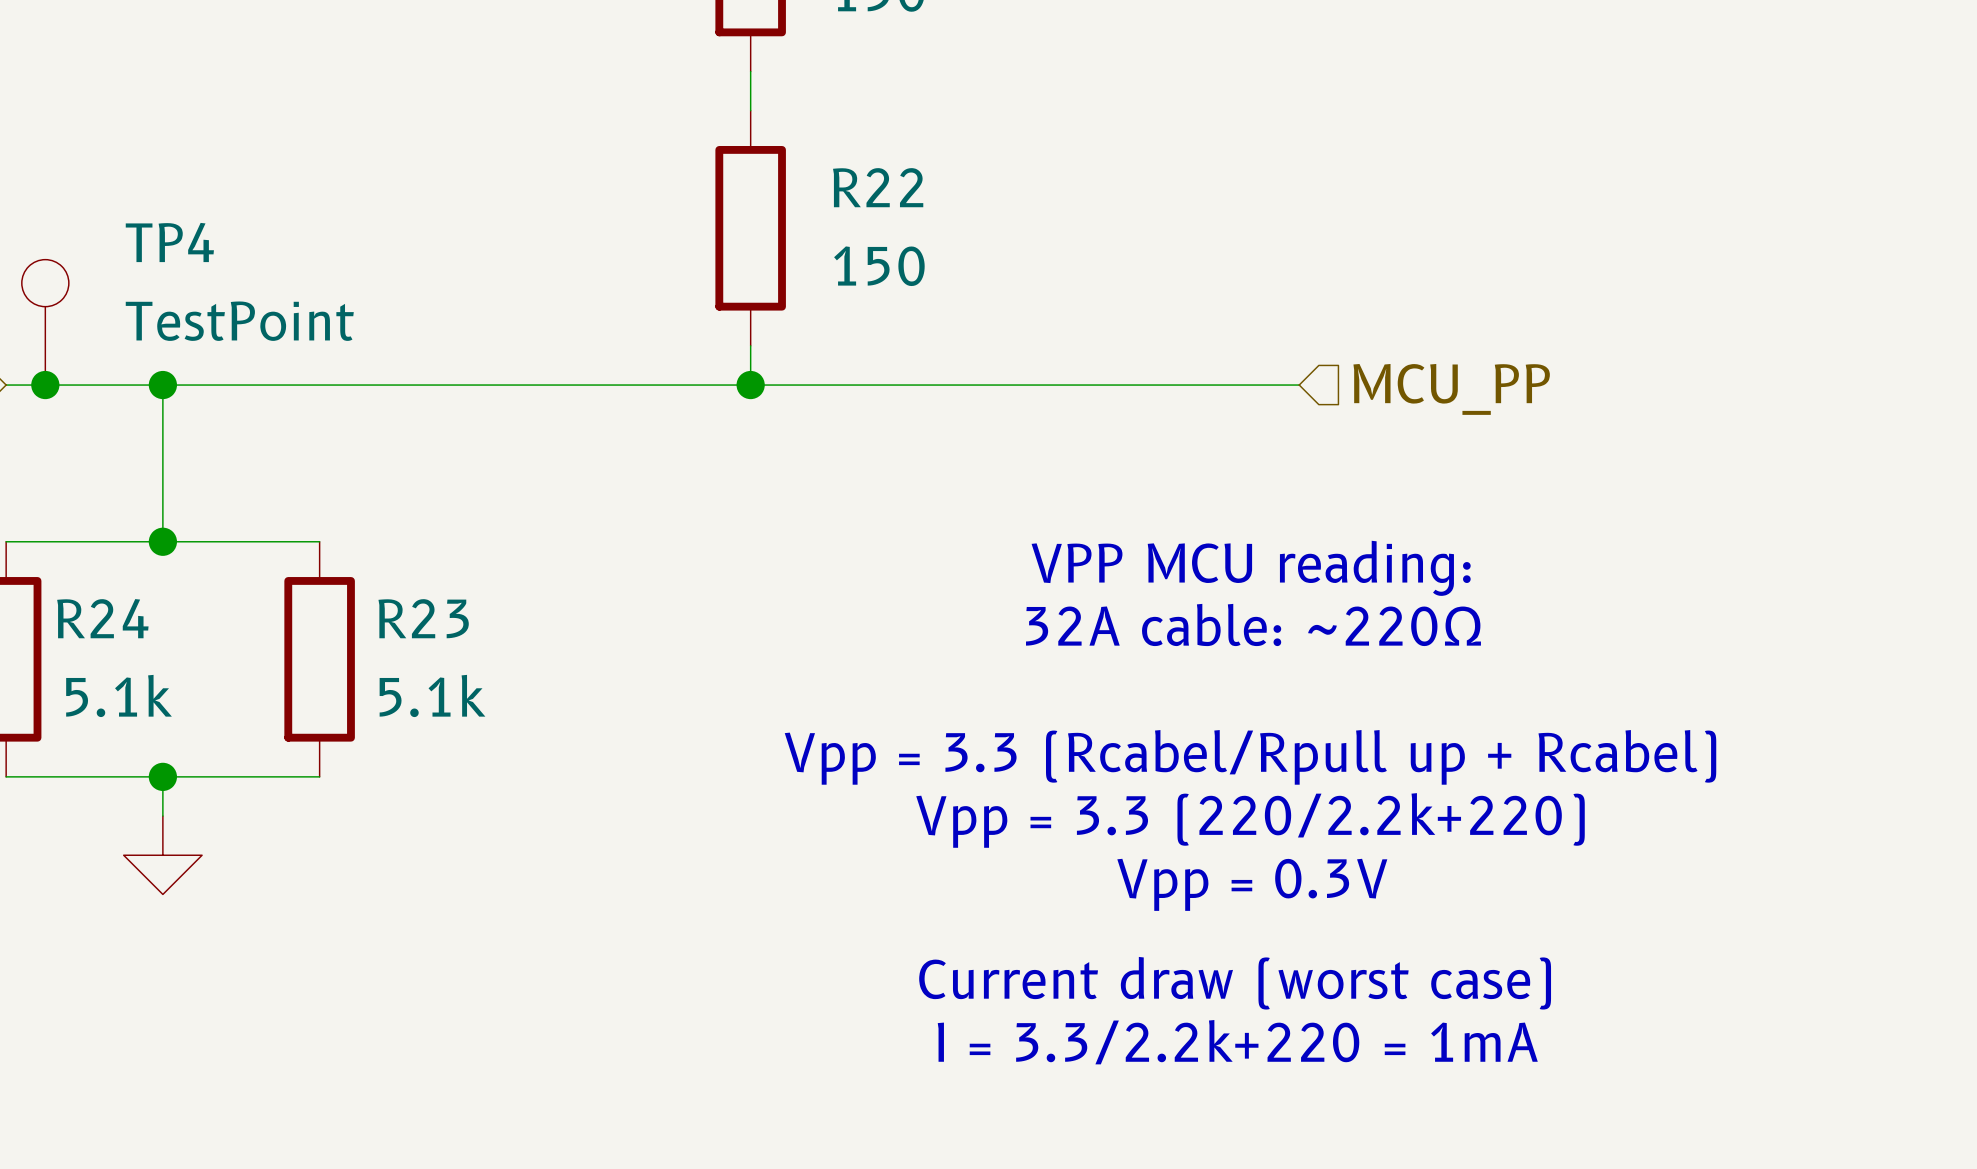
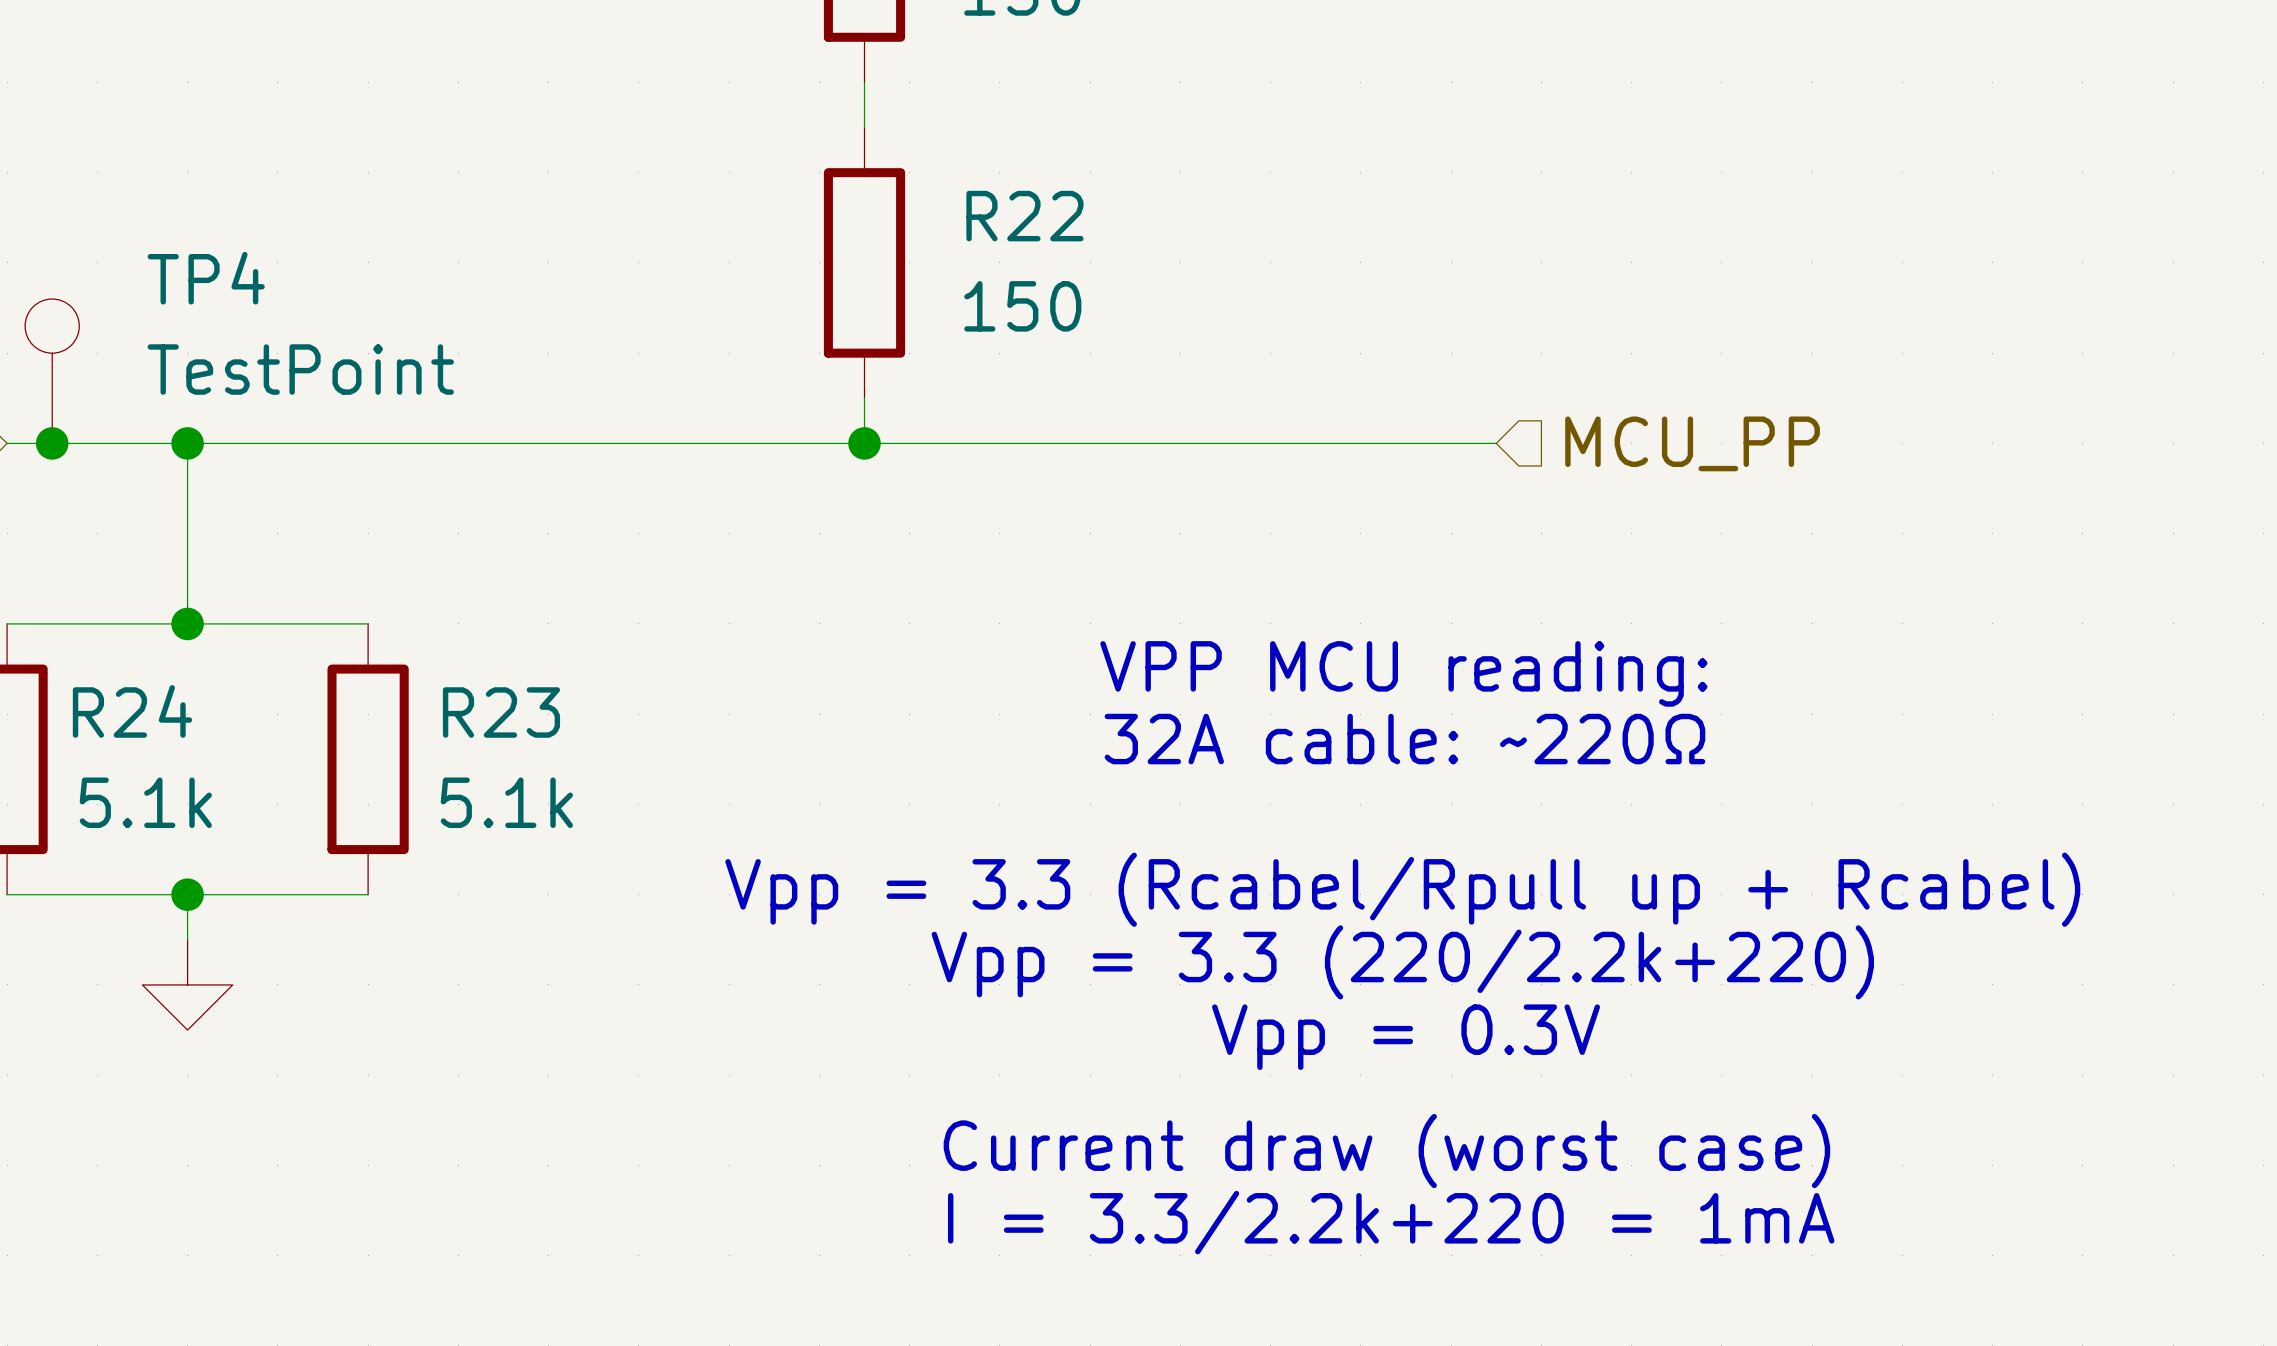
text position: VPP MCU reading: (1251, 568) -> VPP MCU reading: (1403, 673)
text position: 32A cable: ~220Ω (1253, 624) -> 32A cable: ~220Ω (1404, 739)
text position: Vpp = 3.3 (Rcabel/Rpull up + Rcabel) (1250, 757) -> Vpp = 3.3 (Rcabel/Rpull up + Rcabel) (1402, 889)
text position: Vpp = 3.3 (220/2.2k+220) (1250, 820) -> Vpp = 3.3 (220/2.2k+220) (1402, 962)
text position: Vpp = 0.3V (1252, 884) -> Vpp = 0.3V (1406, 1037)
text position: Current draw (worst case) (1235, 983) -> Current draw (worst case) (1386, 1151)
text position: I = 3.3/2.2k+220 = 1mA (1237, 1042) -> I = 3.3/2.2k+220 = 1mA (1391, 1222)

